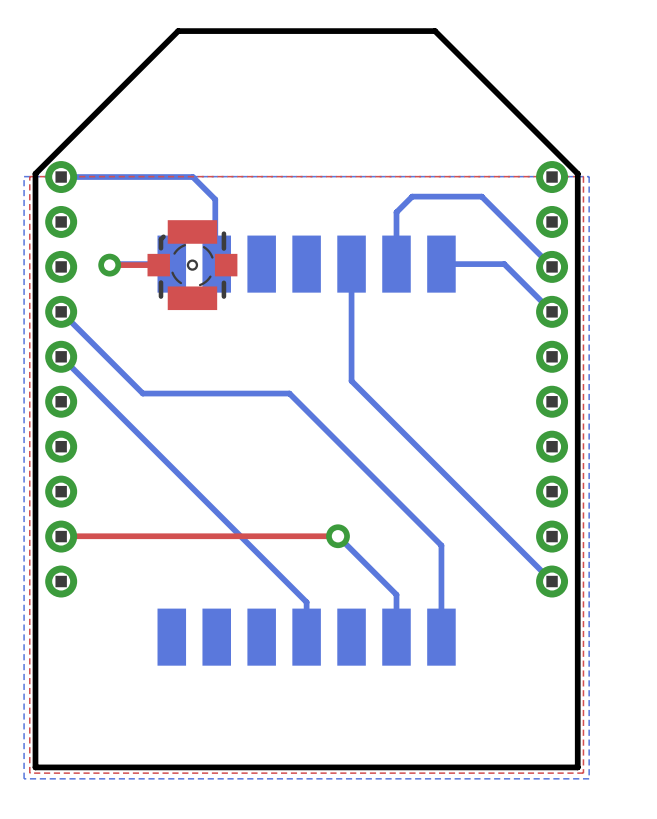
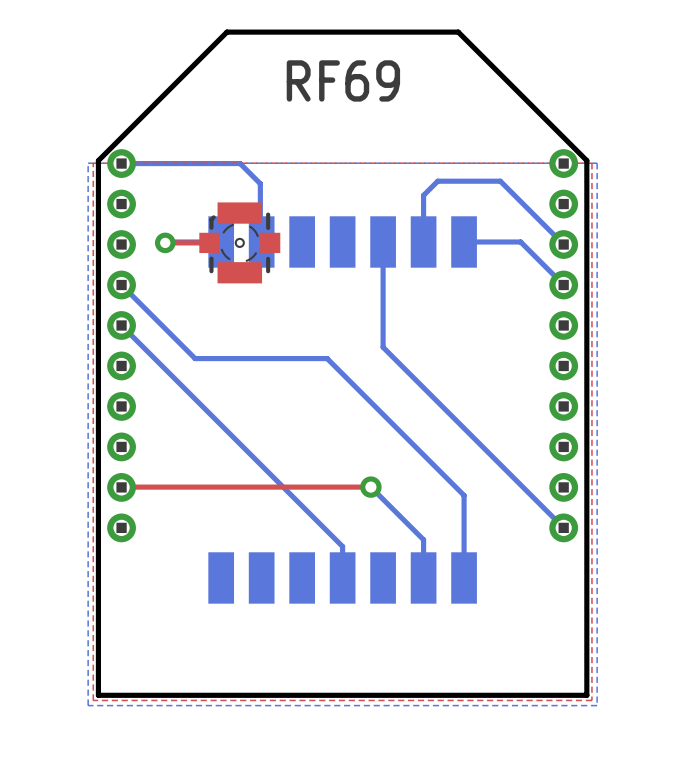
text: none -> RF69 (343, 80)

